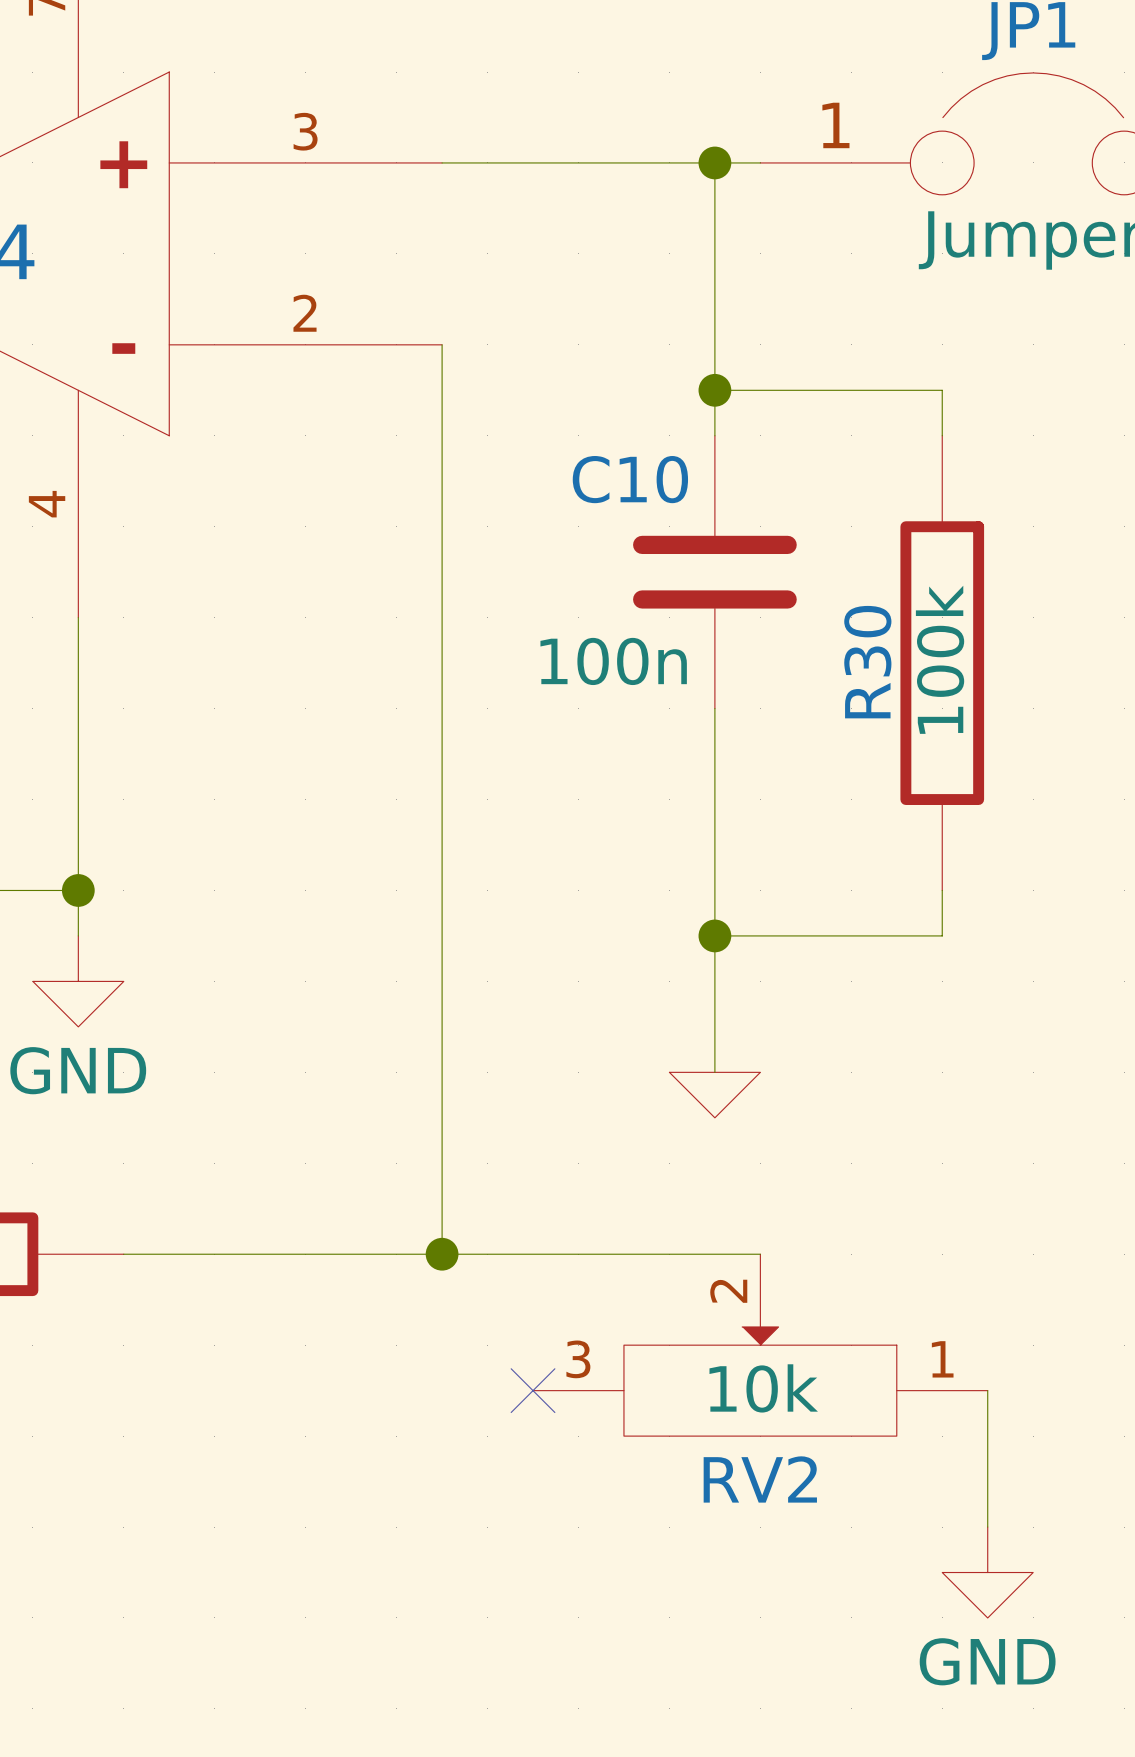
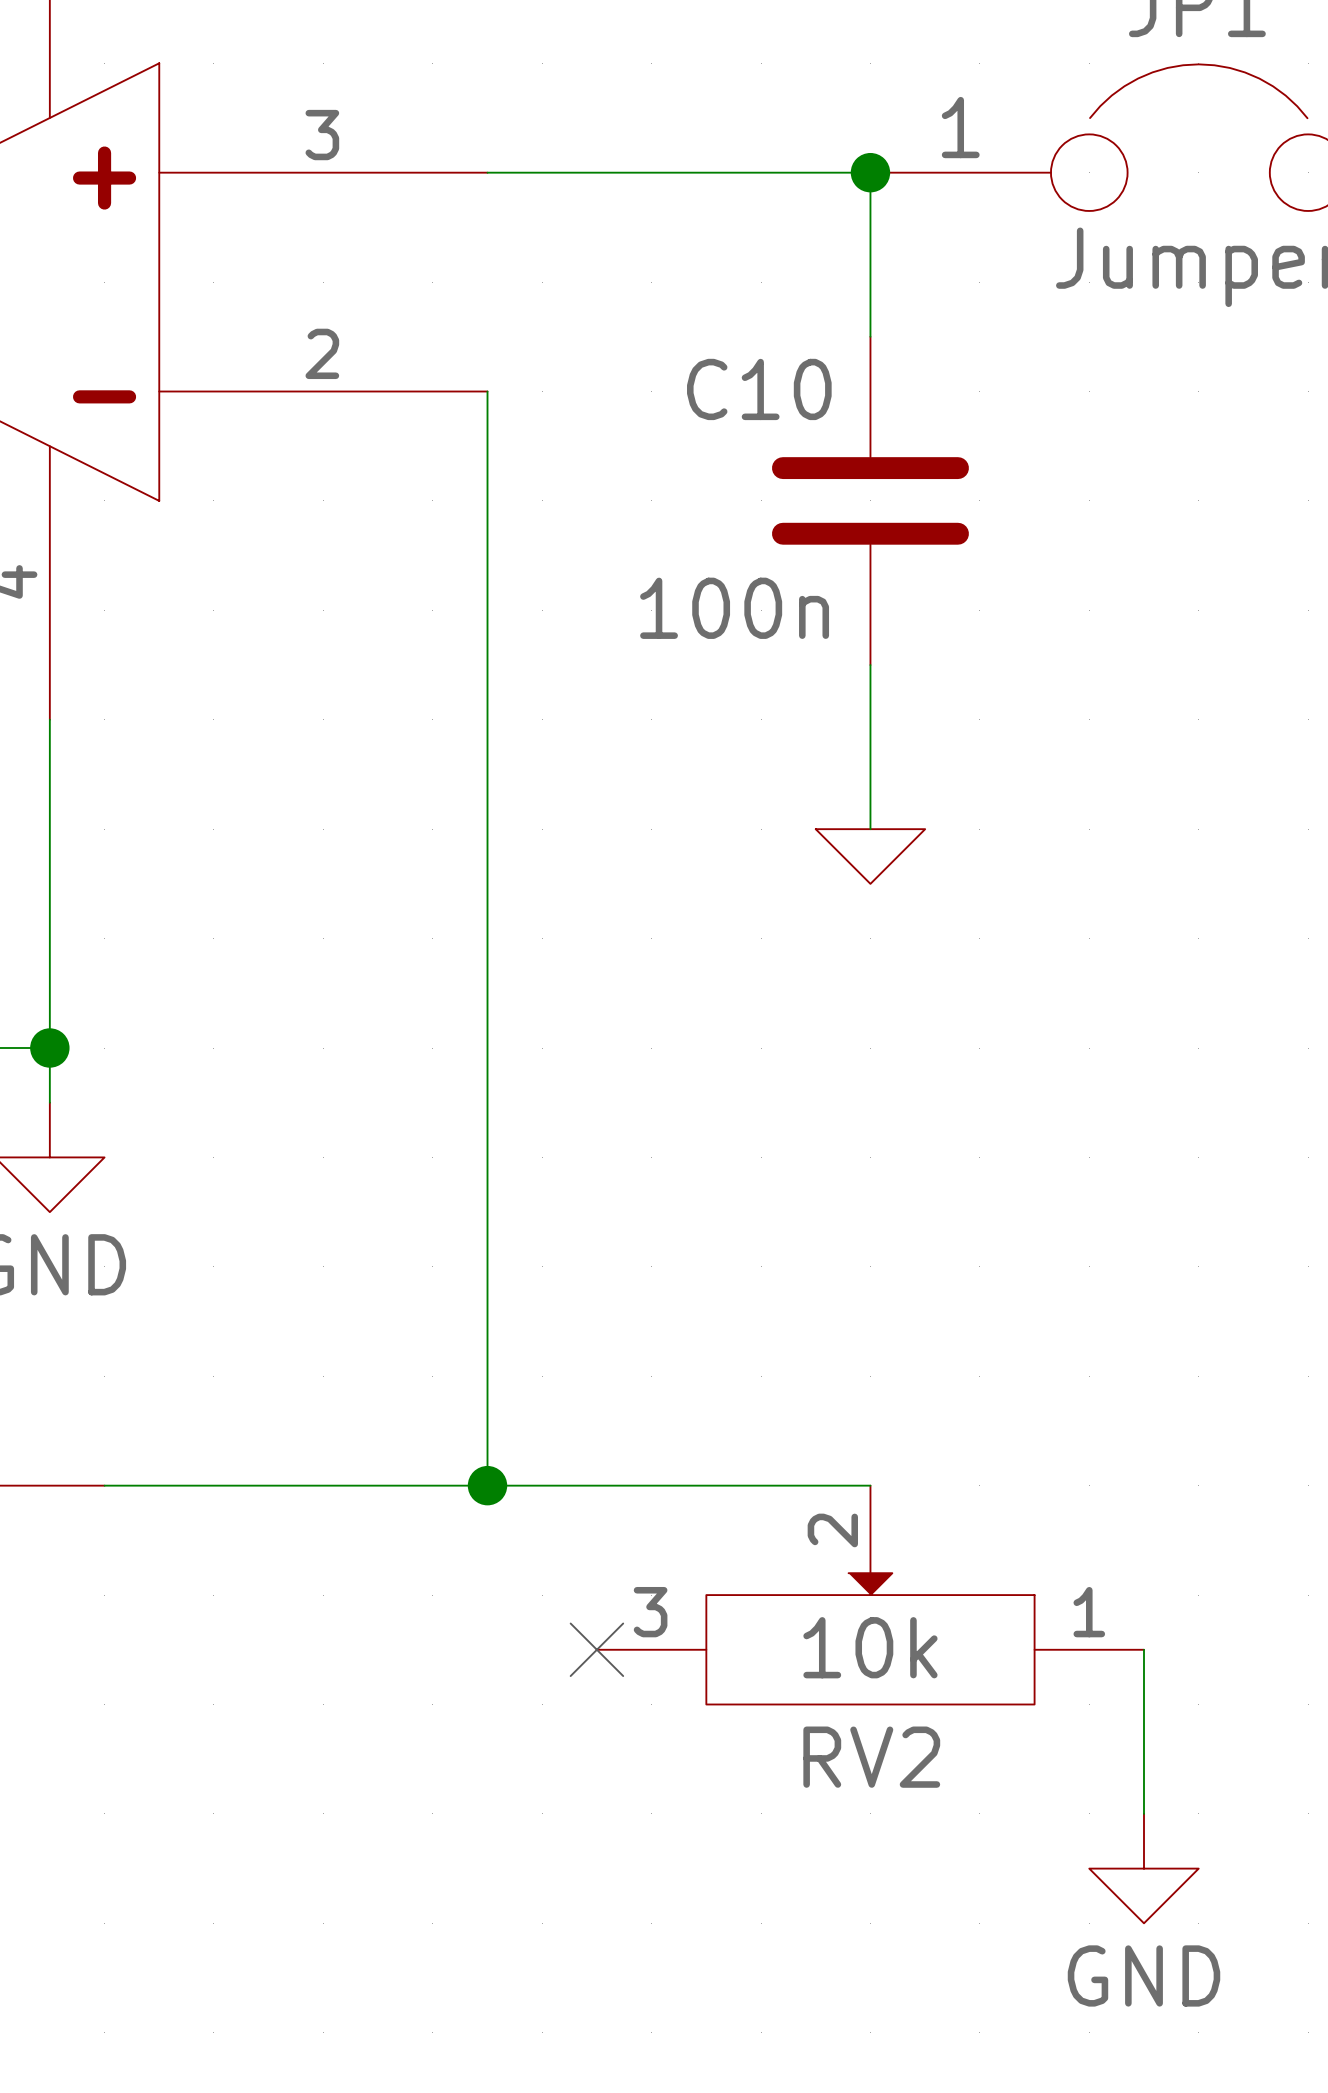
wire: (714, 162) (714, 435) -> none
junction position: (714, 162) -> (870, 172)
wire: none -> (870, 172) (870, 336)
wire: (714, 390) (942, 390) (942, 435) -> none
junction: (714, 390) -> none
C10 position: (714, 572) -> (870, 500)
wire: none -> (870, 665) (870, 829)
R30: 100k (942, 663) -> none
wire: (714, 708) (714, 1072) -> none
wire: (942, 890) (942, 935) (714, 935) -> none
junction: (714, 935) -> none
power symbol position: (714, 1095) -> (870, 856)

